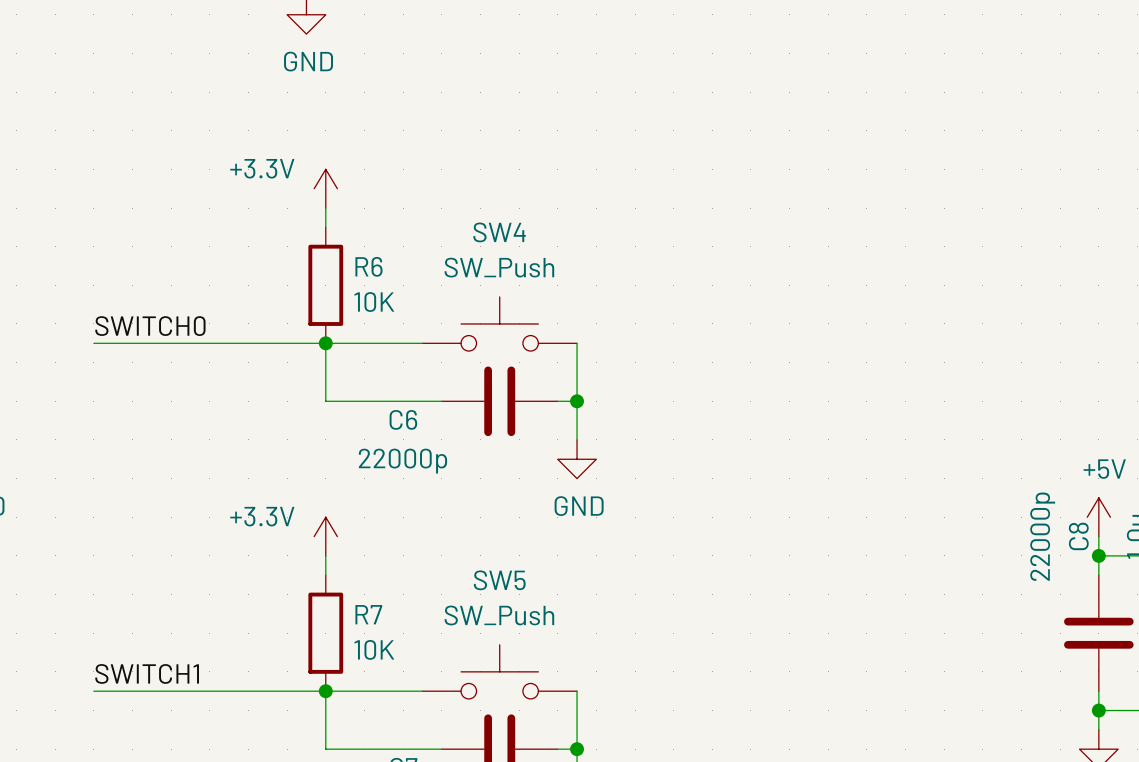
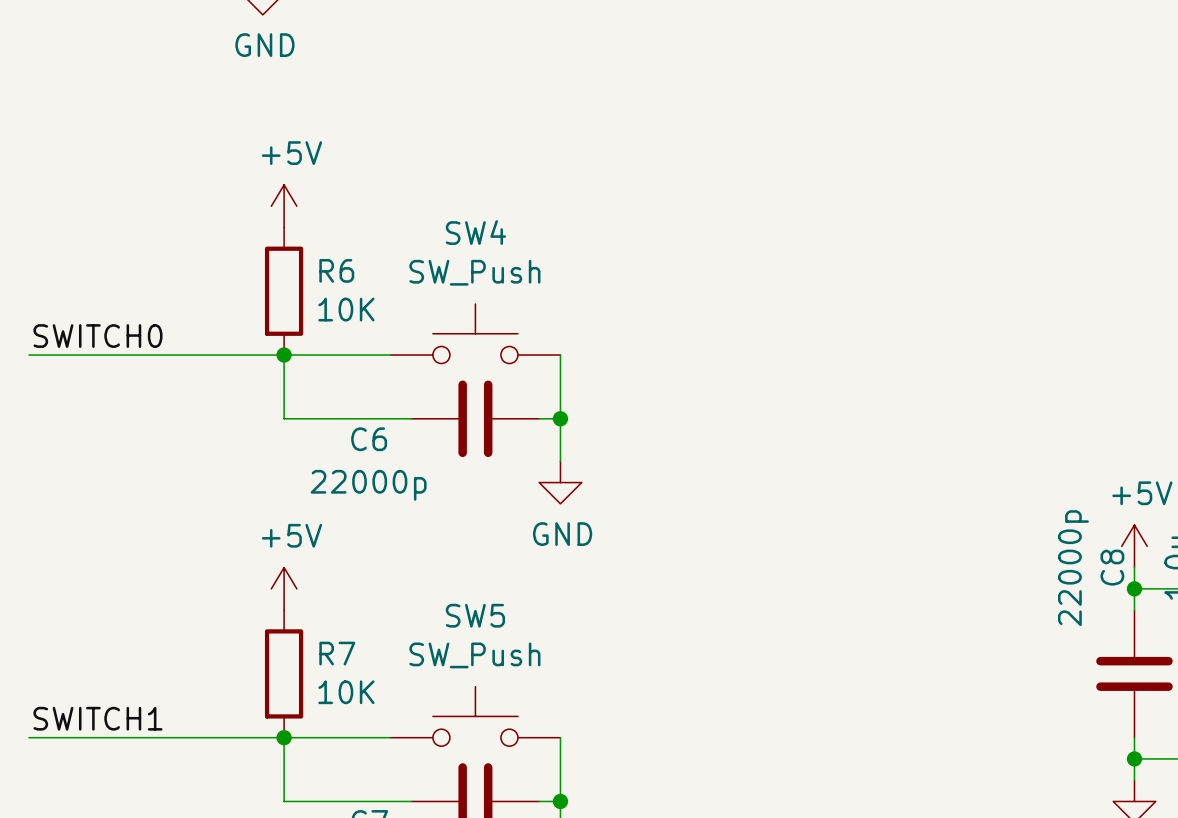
power symbol: +3.3V (325, 188) -> none
power symbol: none -> +5V (284, 206)
power symbol: +3.3V (325, 536) -> none
power symbol: none -> +5V (284, 588)

